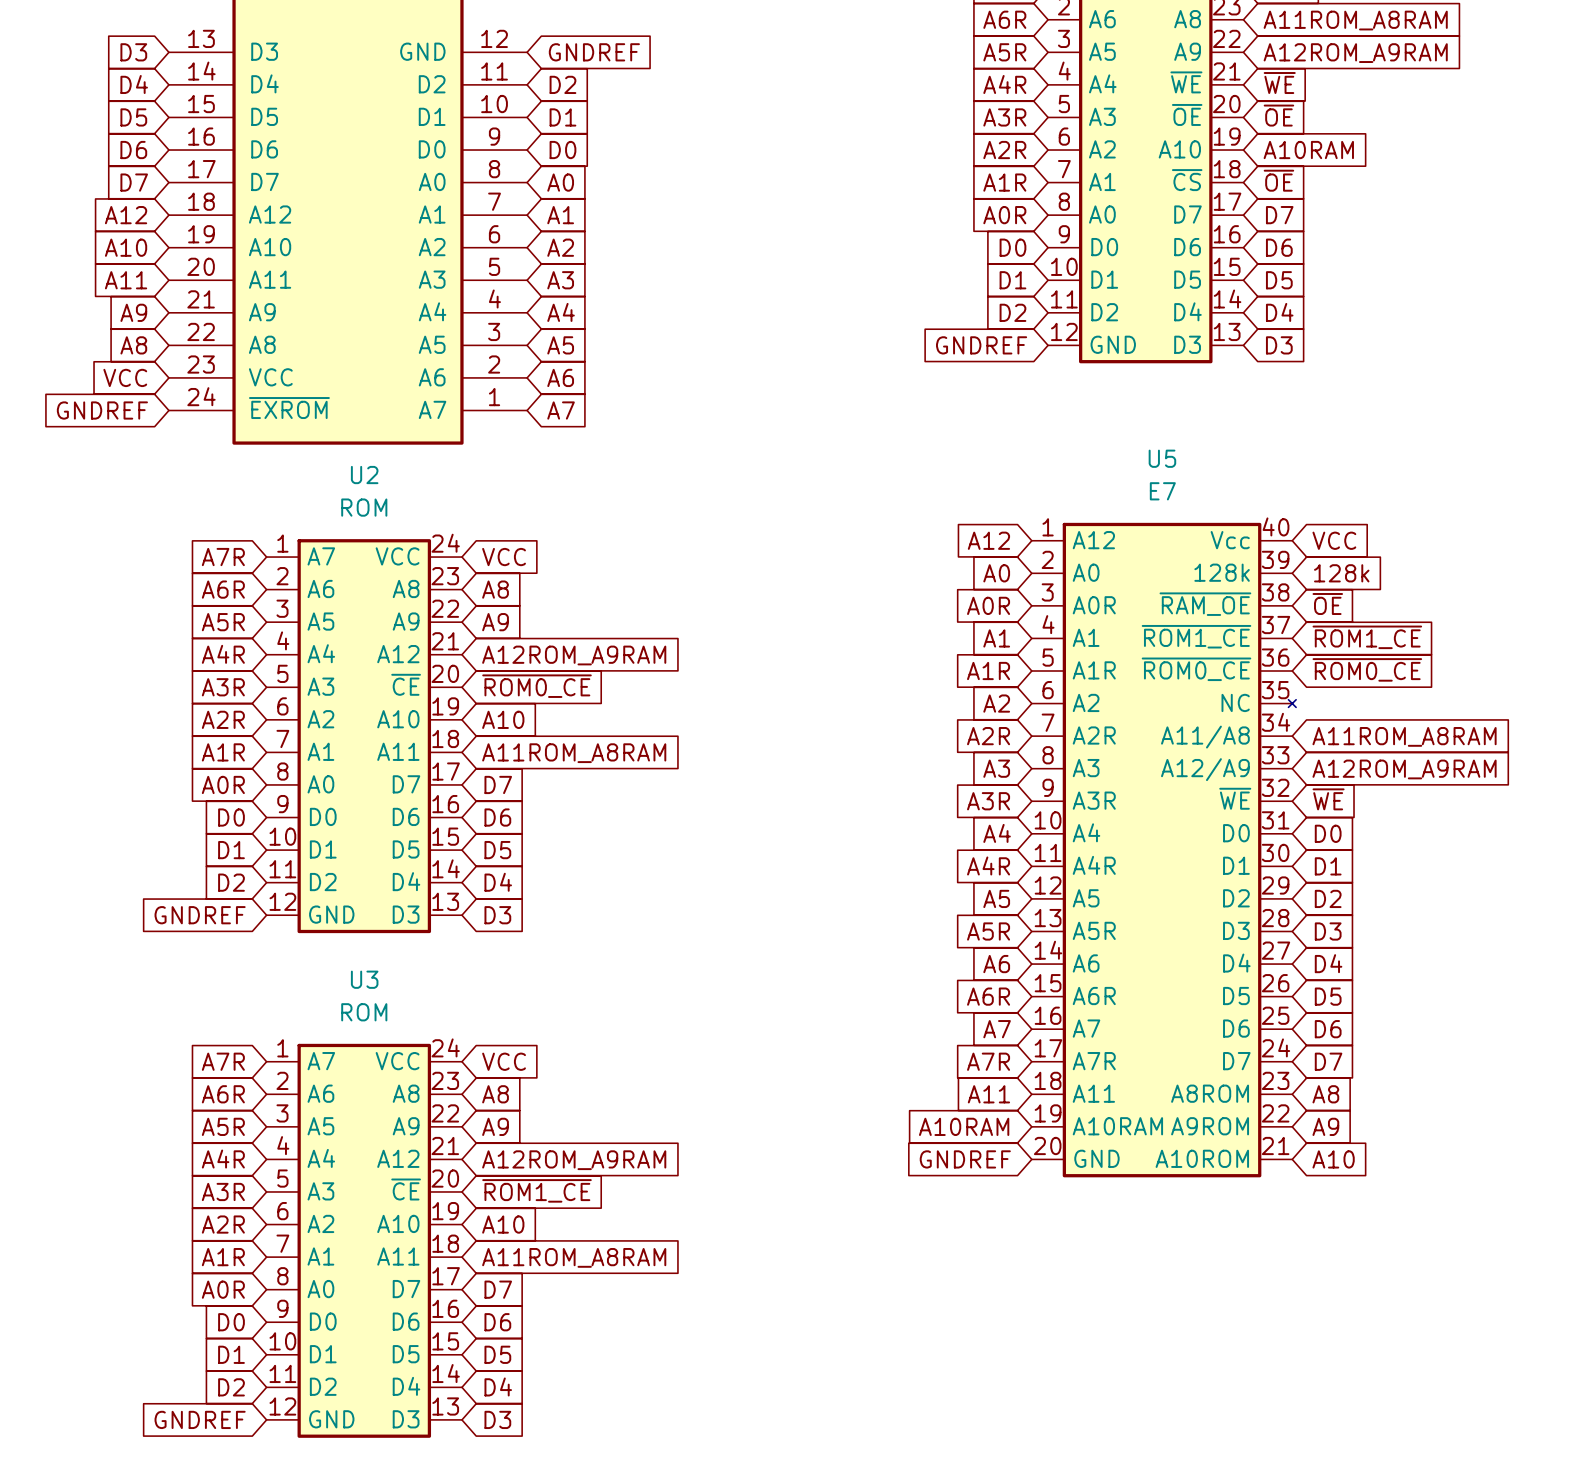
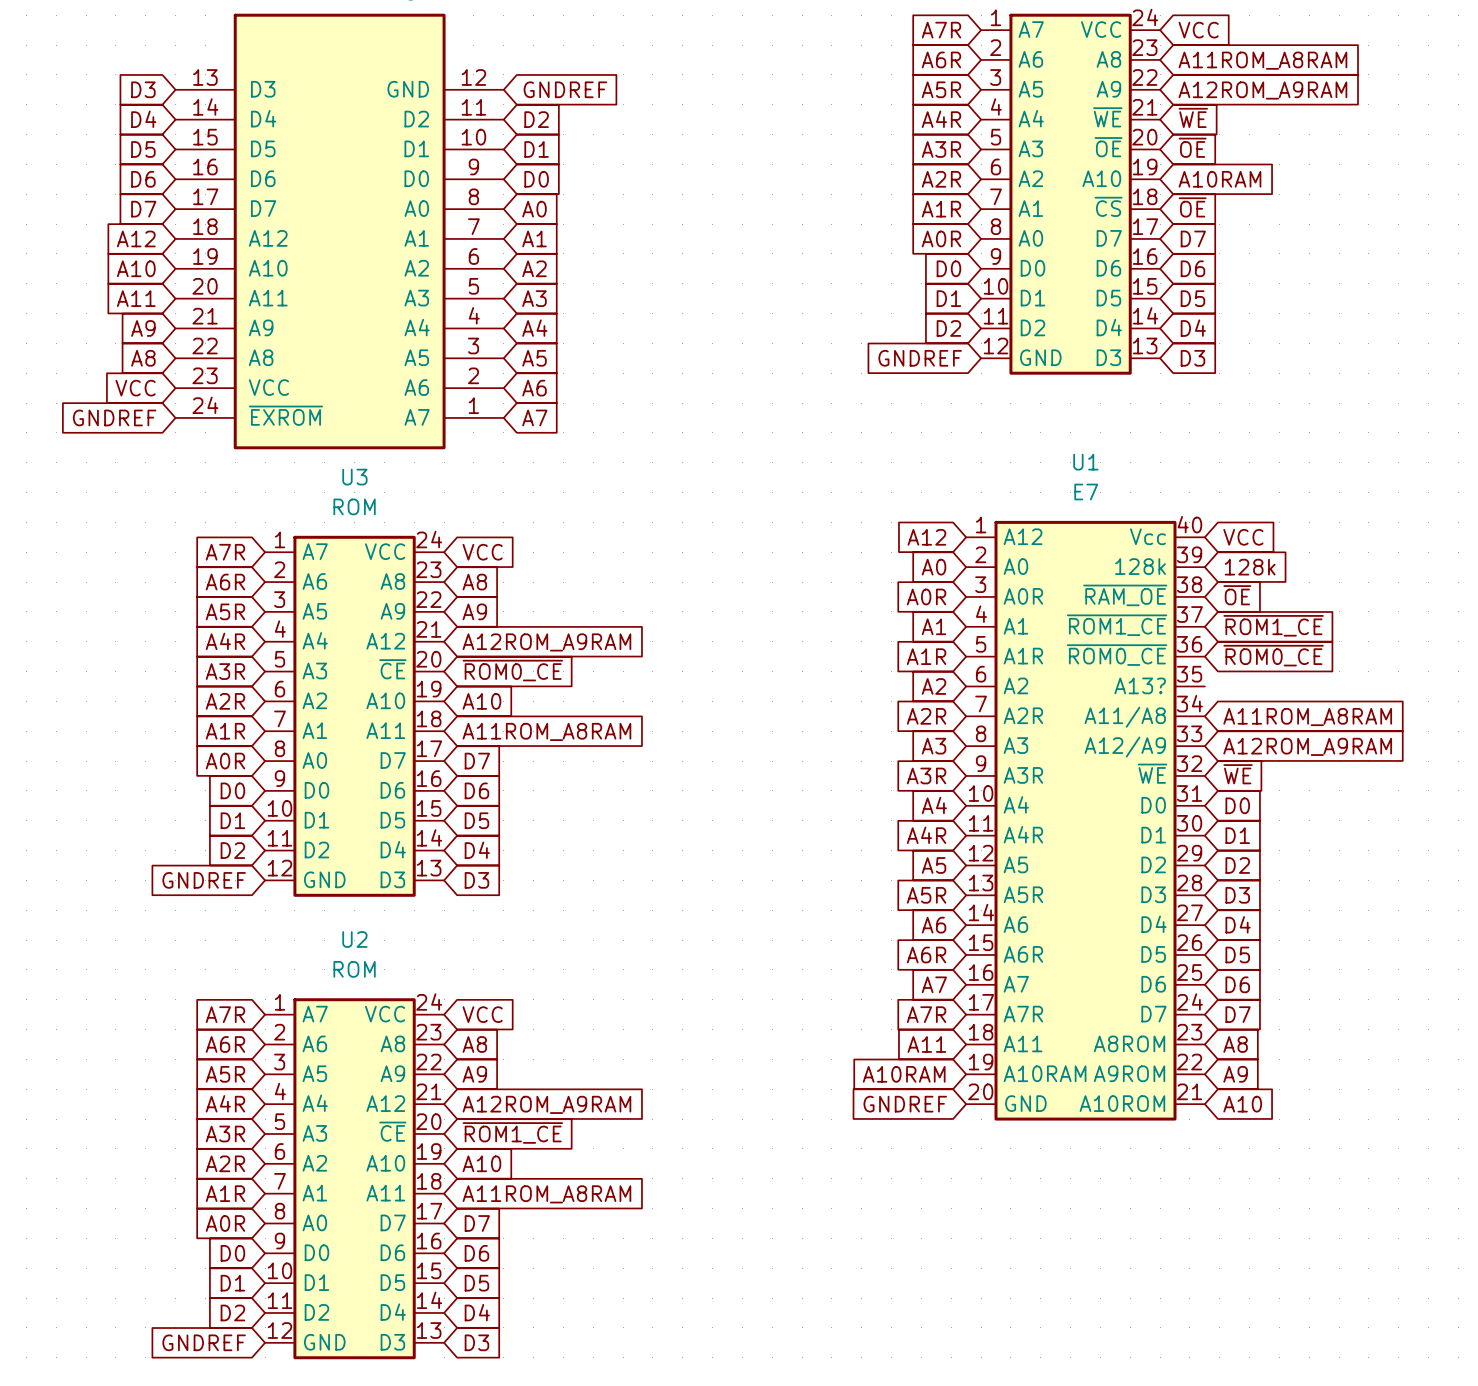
U2 name: U2 (364, 475) -> U3 (354, 477)
U1: none -> E7 (1085, 820)
U5: E7 (1163, 850) -> none
U3 name: U3 (364, 979) -> U2 (354, 939)

